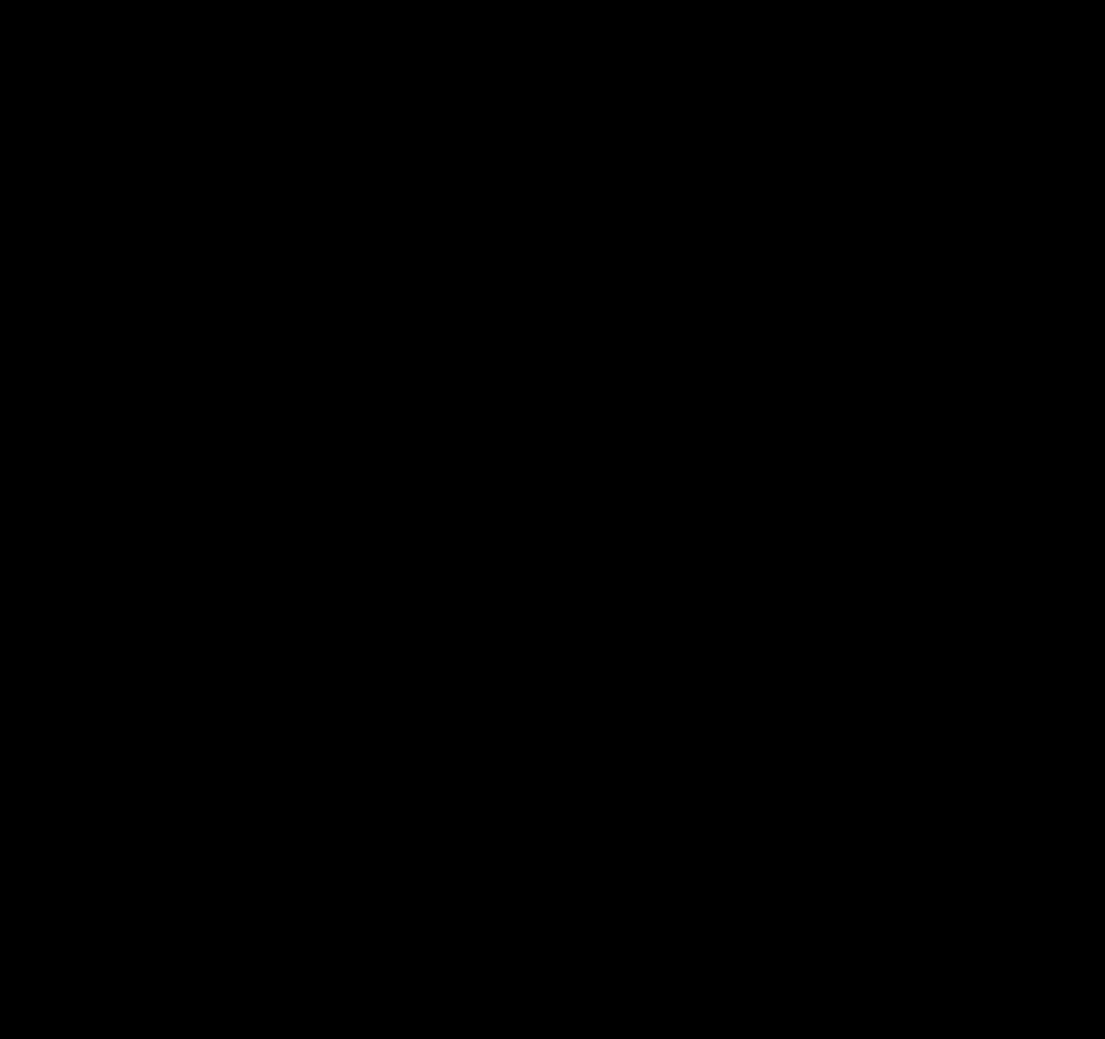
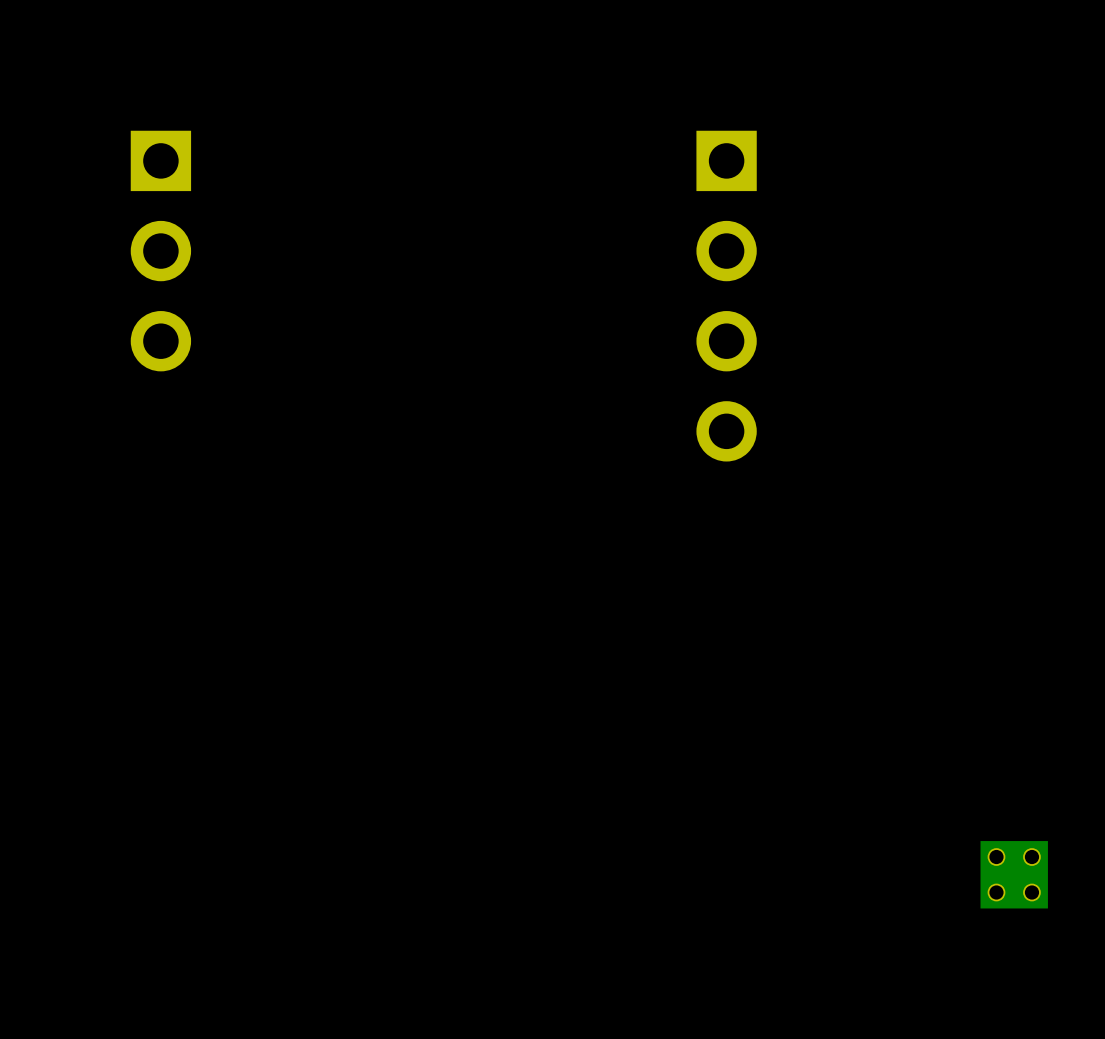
part: none -> (160, 251)
part: none -> (726, 296)
part: none -> (1014, 874)

